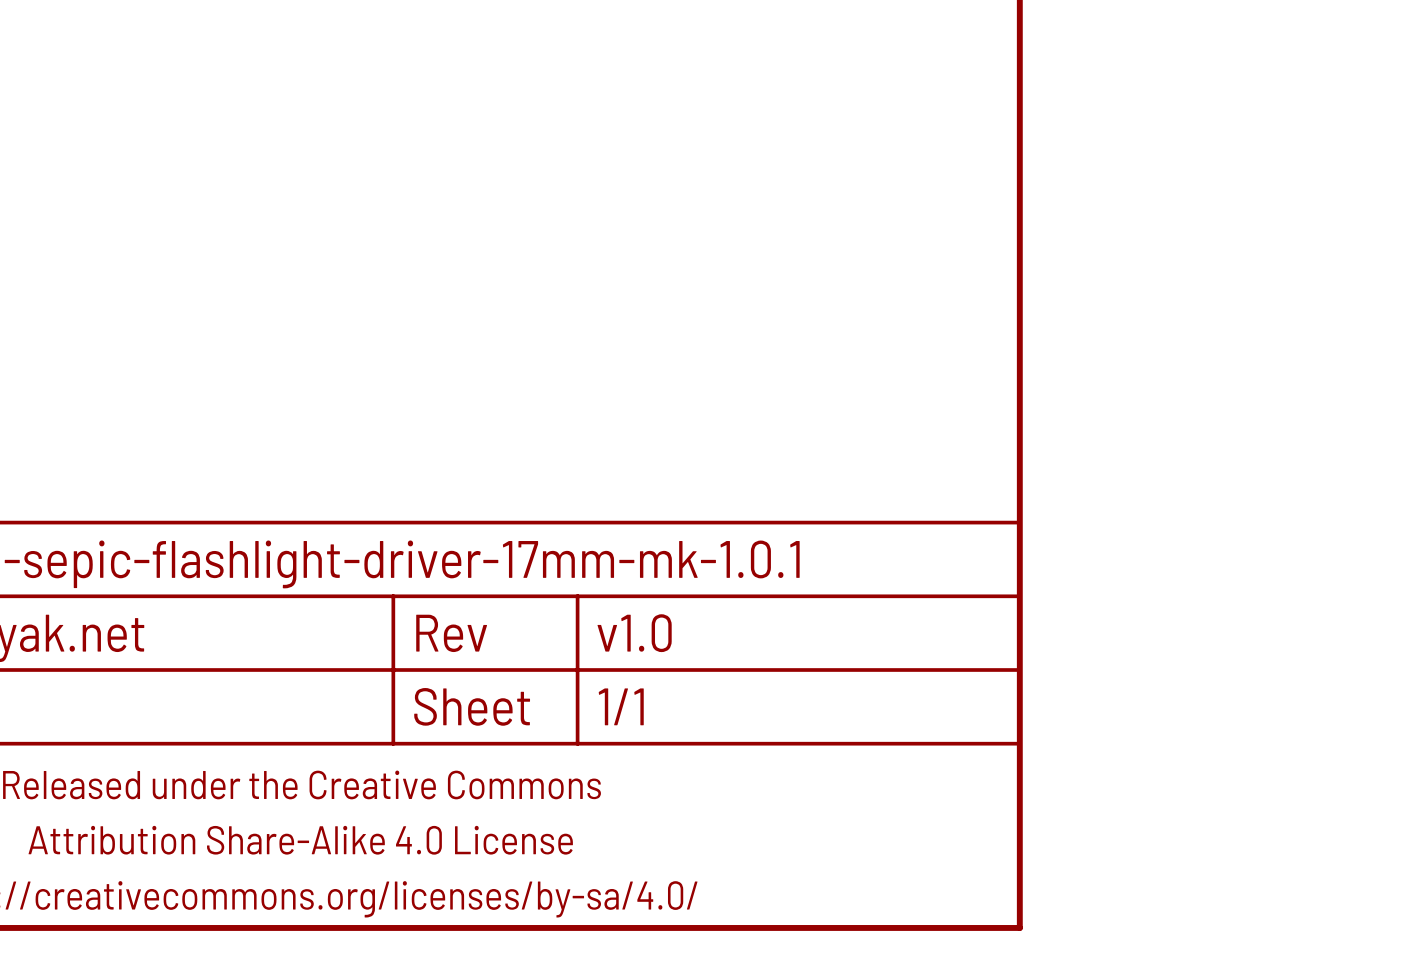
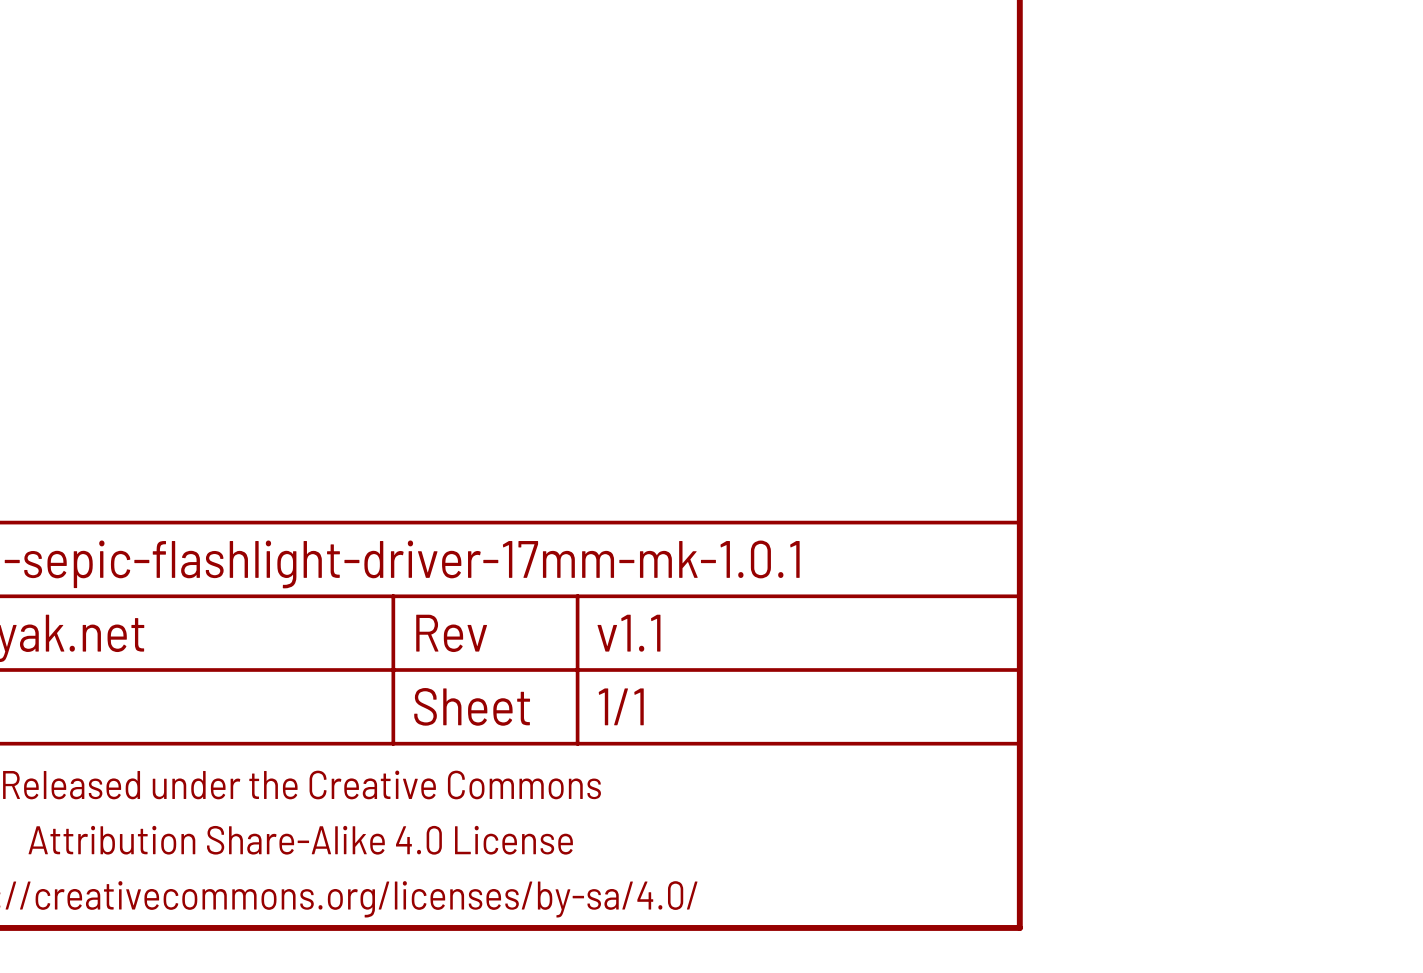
part text: v1.0 (634, 633) -> v1.1 (629, 633)

